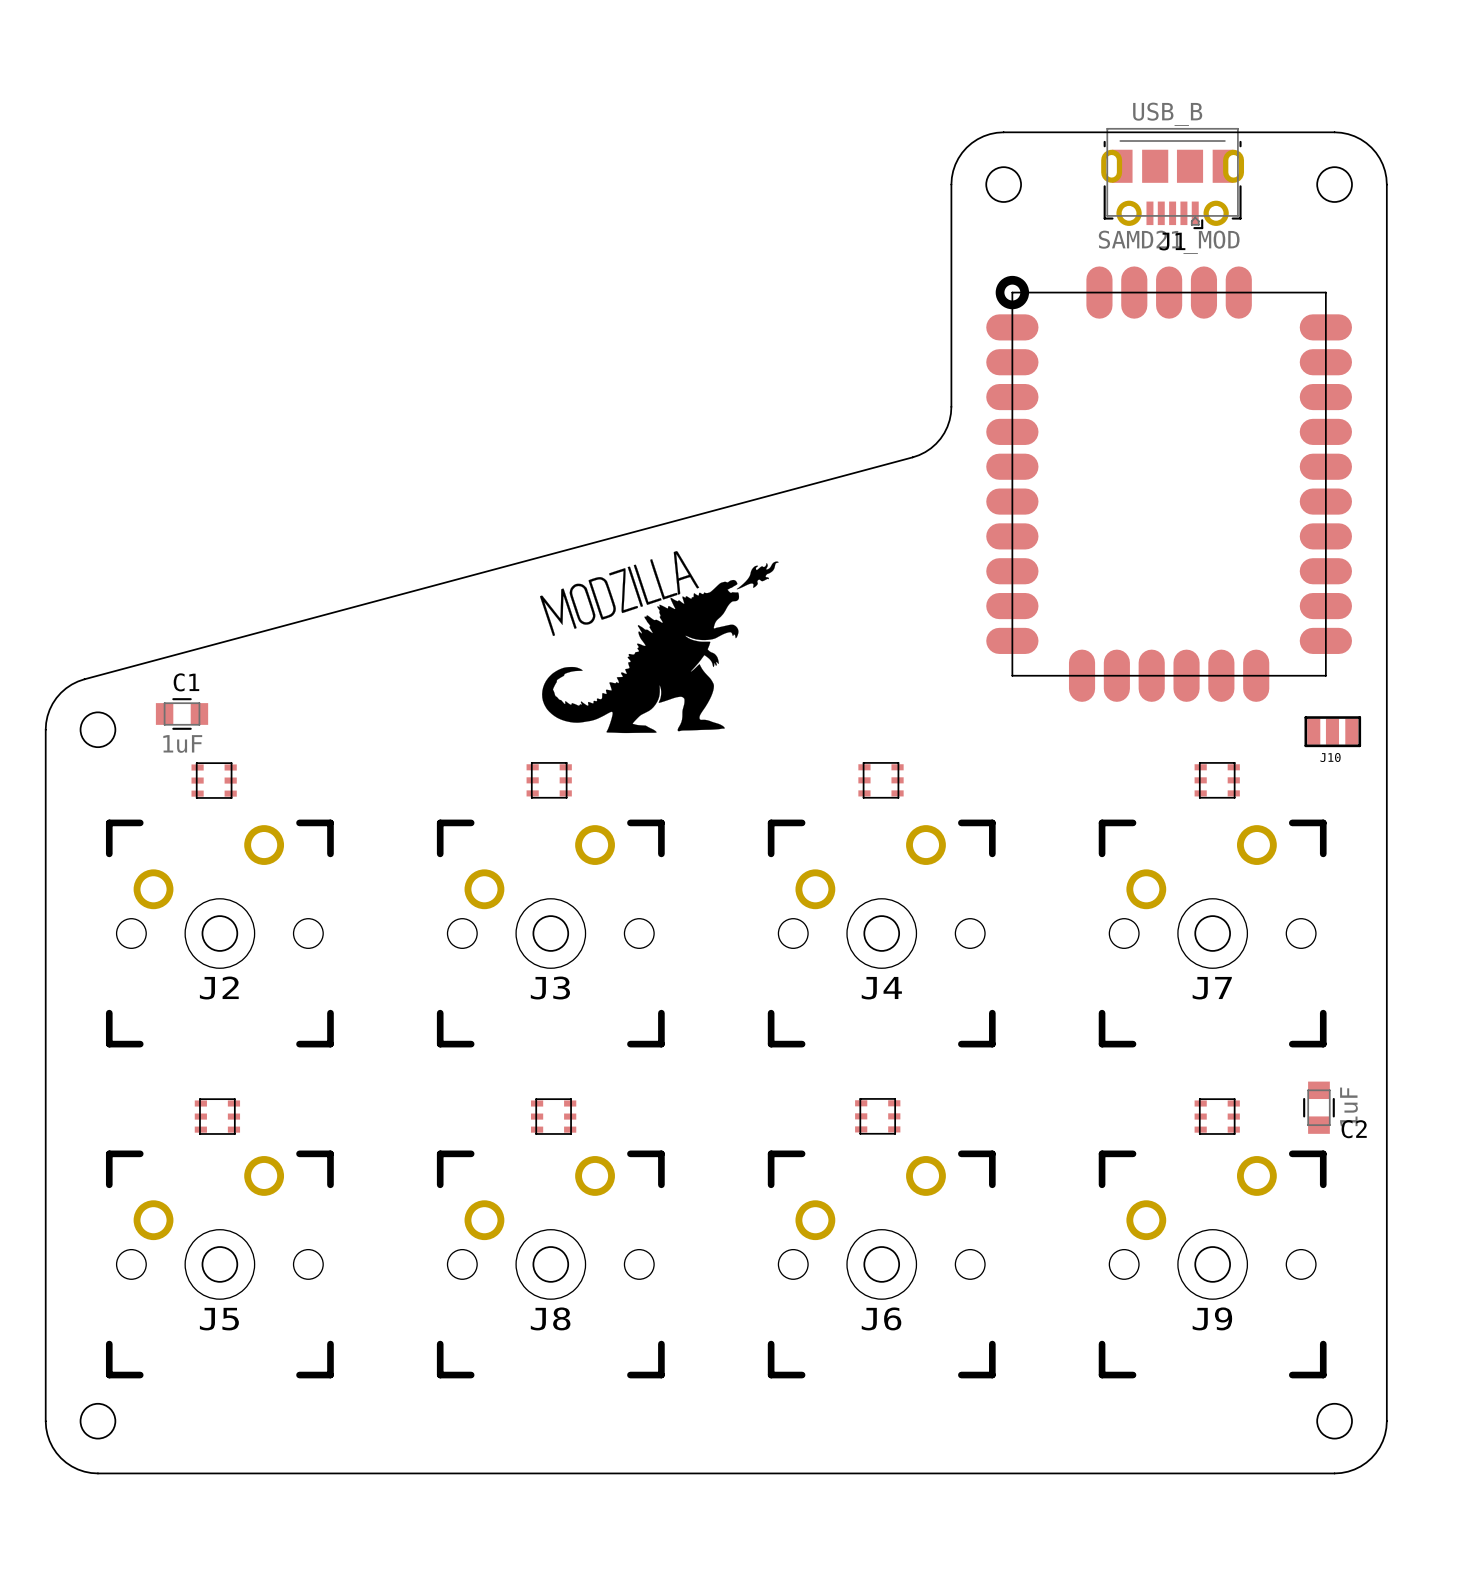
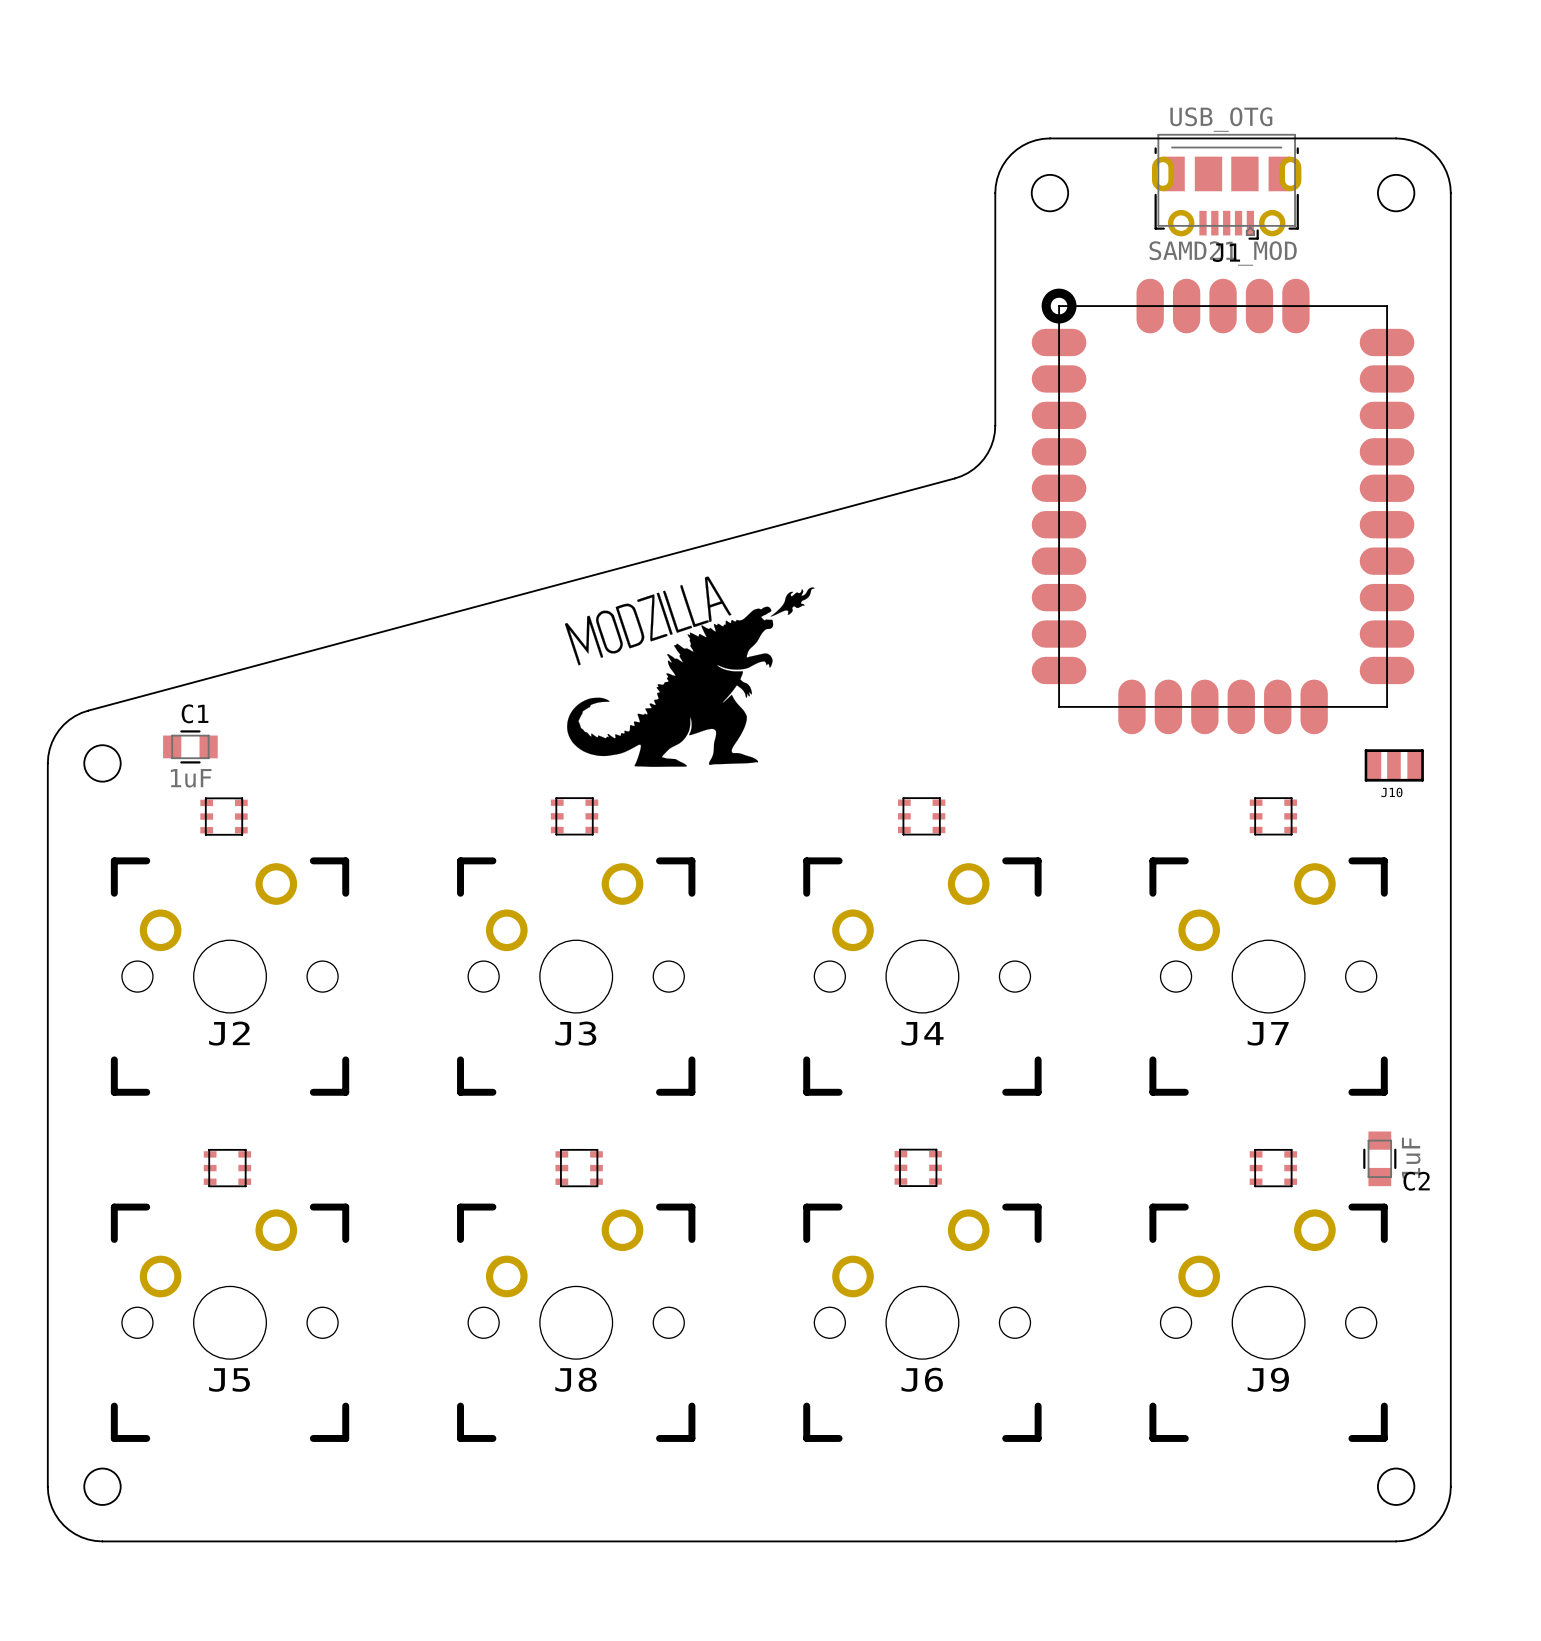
J1 value: USB_B (1167, 114) -> USB_OTG (1221, 119)
round board edge: [201, 915, 239, 952] -> none
round board edge: [532, 915, 570, 952] -> none
round board edge: [863, 915, 901, 952] -> none
round board edge: [1194, 915, 1231, 952] -> none
round board edge: [201, 1246, 239, 1283] -> none
round board edge: [532, 1246, 570, 1283] -> none
round board edge: [863, 1246, 901, 1283] -> none
round board edge: [1194, 1246, 1231, 1283] -> none

